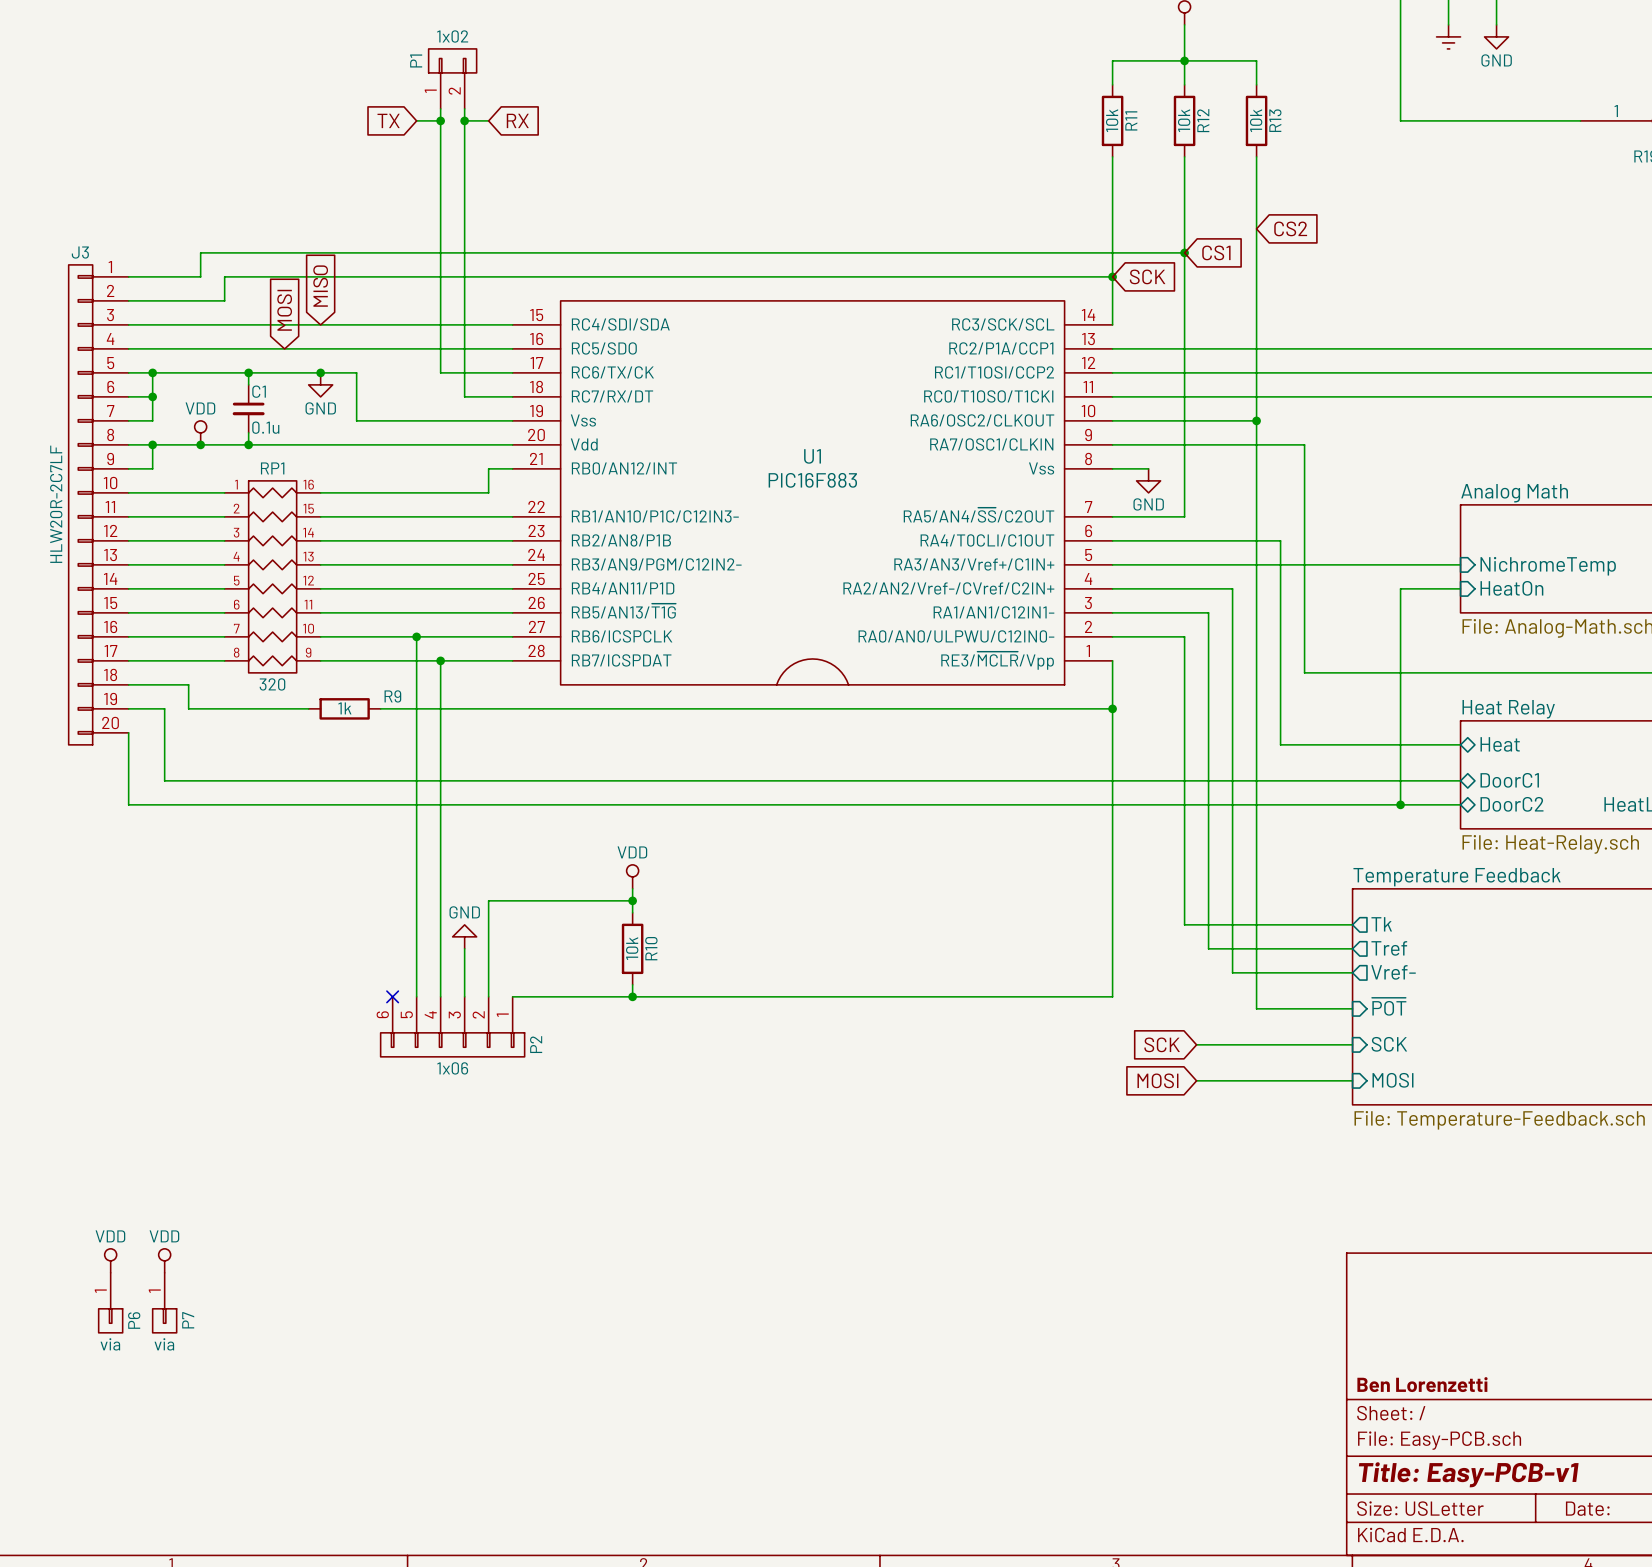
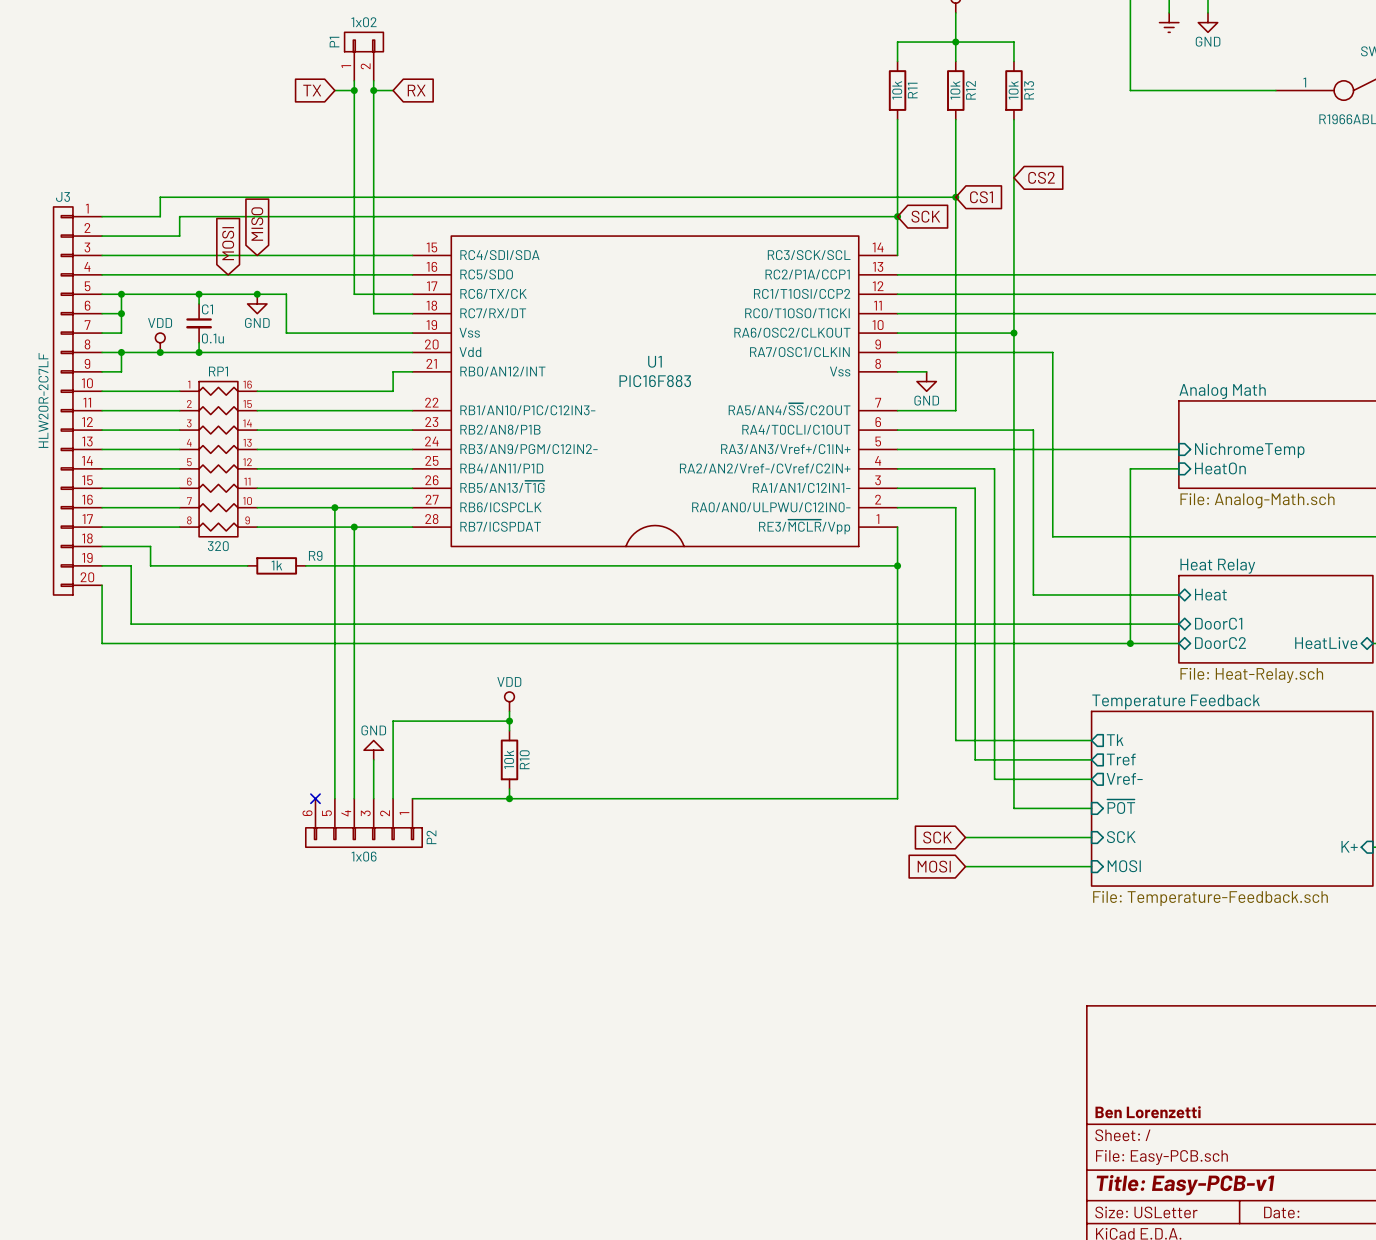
power symbol: VDD (110, 1260) -> none
power symbol: VDD (164, 1260) -> none
P6: via (110, 1302) -> none
P7: via (164, 1302) -> none

